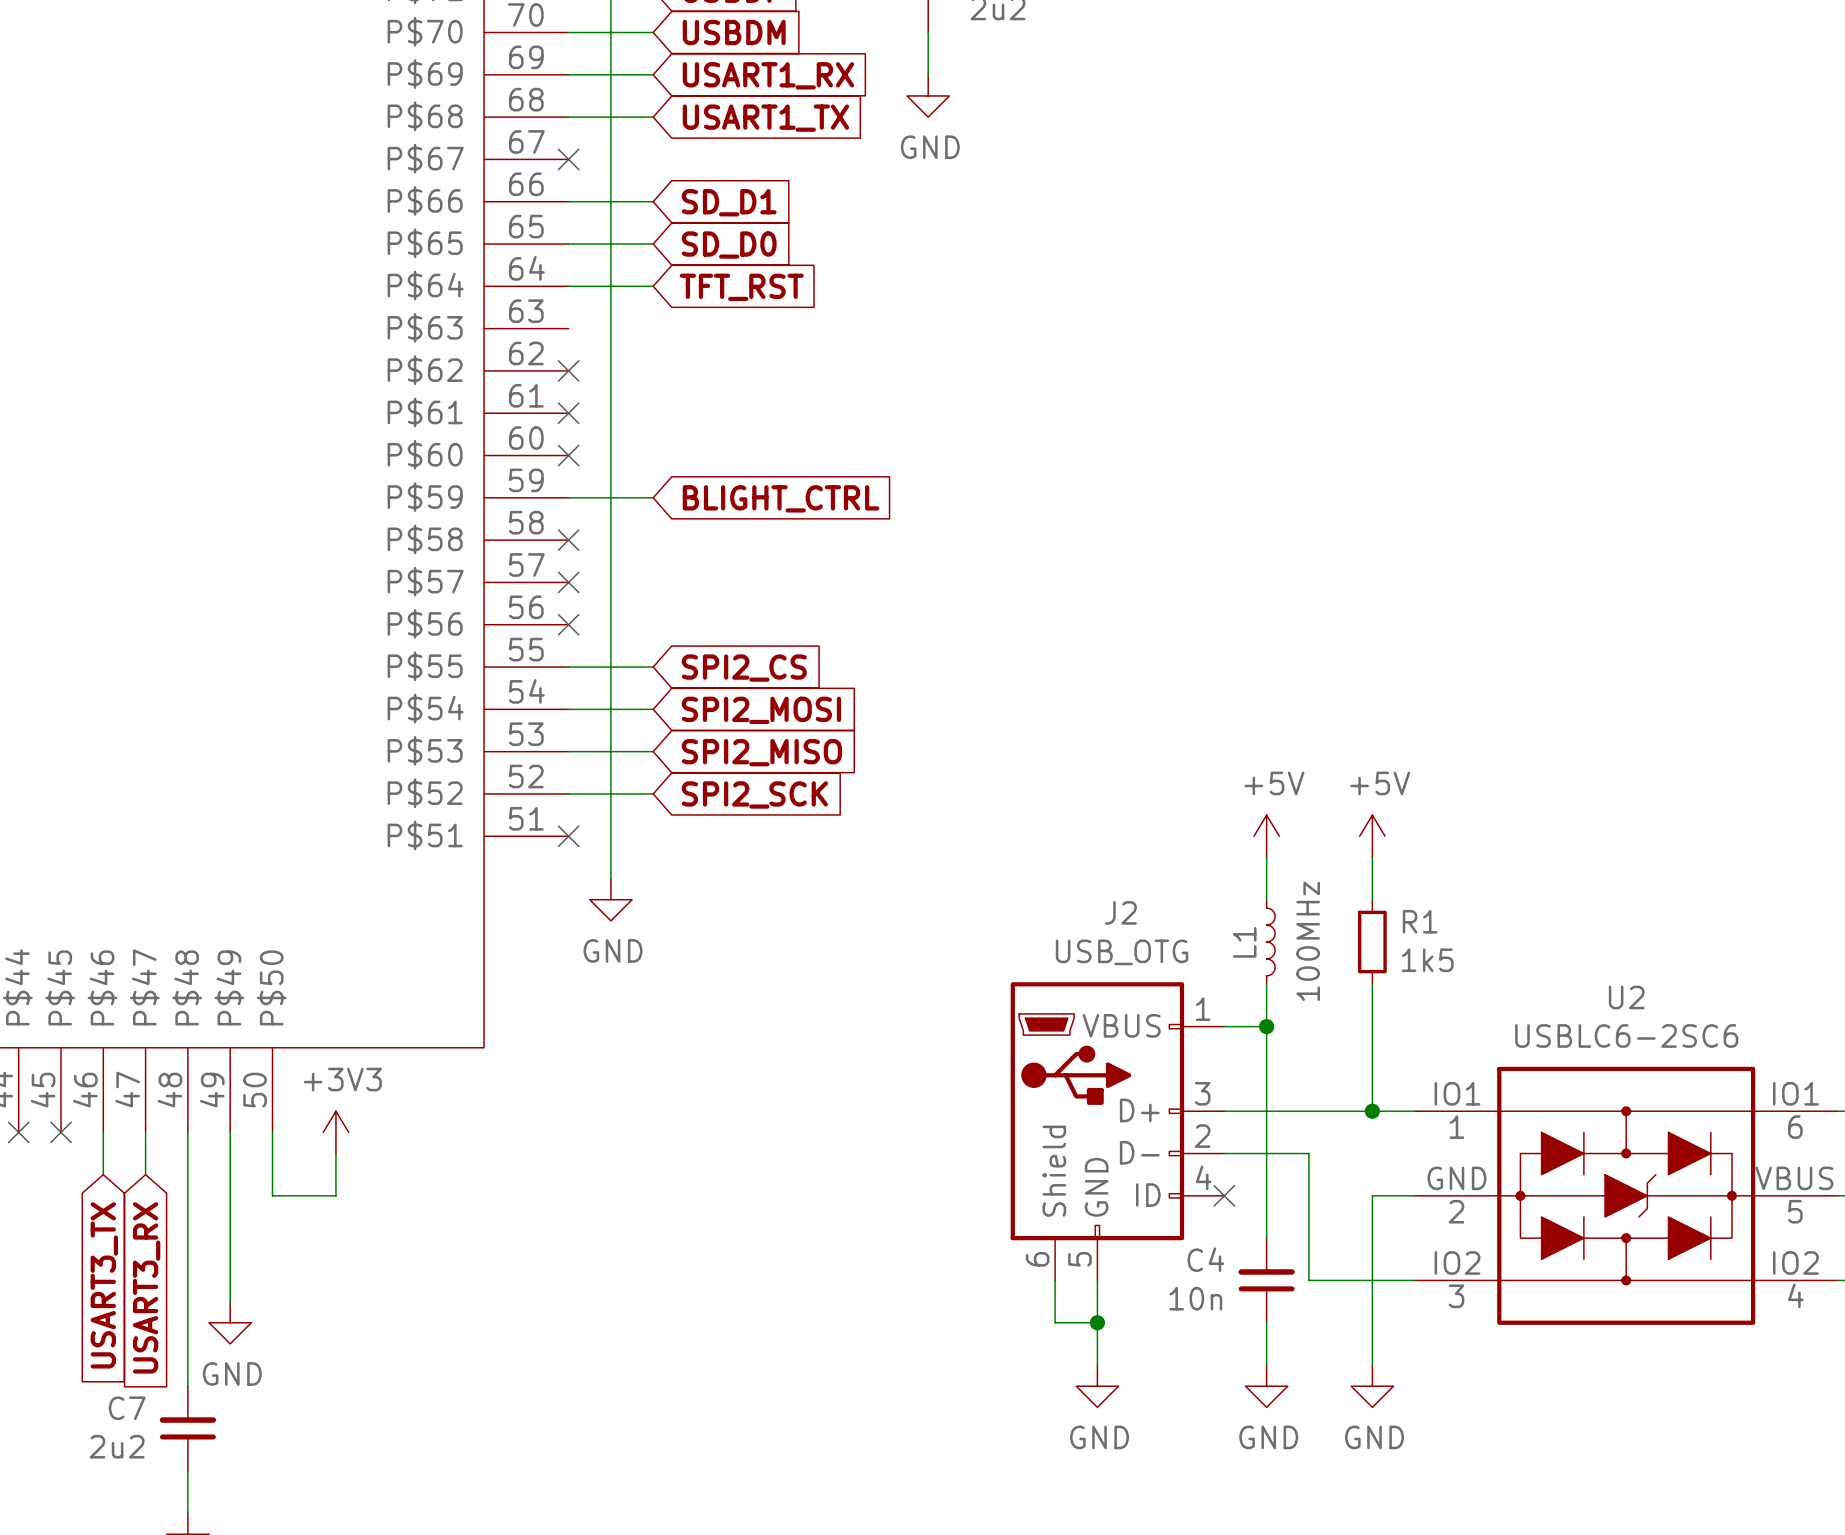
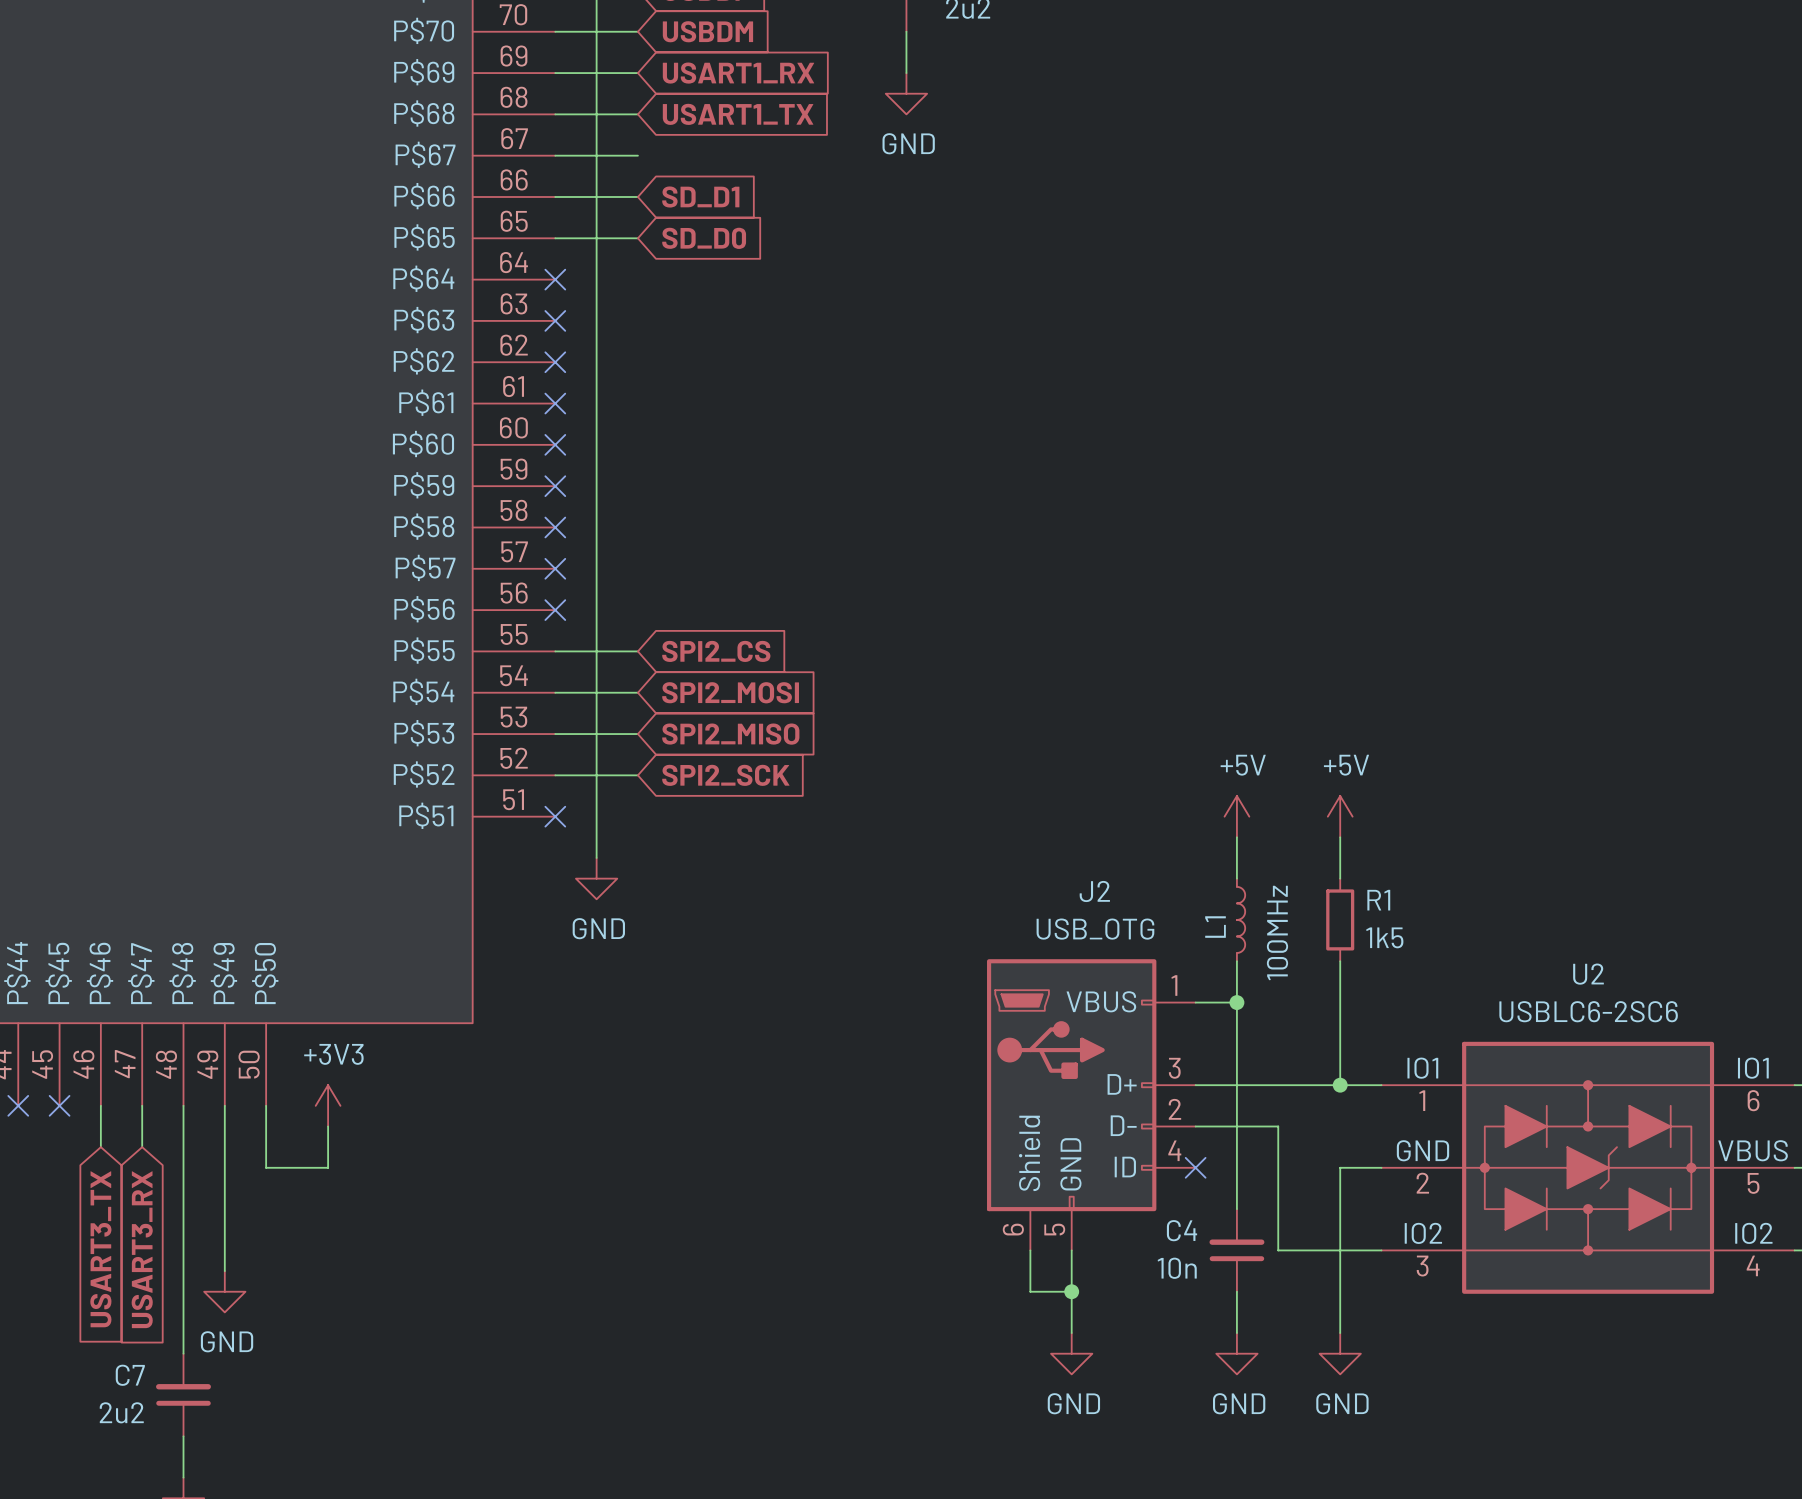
no-connect mark: (568, 159) -> none
wire: (568, 286) (653, 286) -> (555, 155) (637, 155)
no-connect mark: none -> (555, 279)
global label: TFT_RST (741, 287) -> none
no-connect mark: none -> (555, 320)
wire: (568, 497) (653, 497) -> none
no-connect mark: none -> (555, 486)
global label: BLIGHT_CTRL (781, 498) -> none

